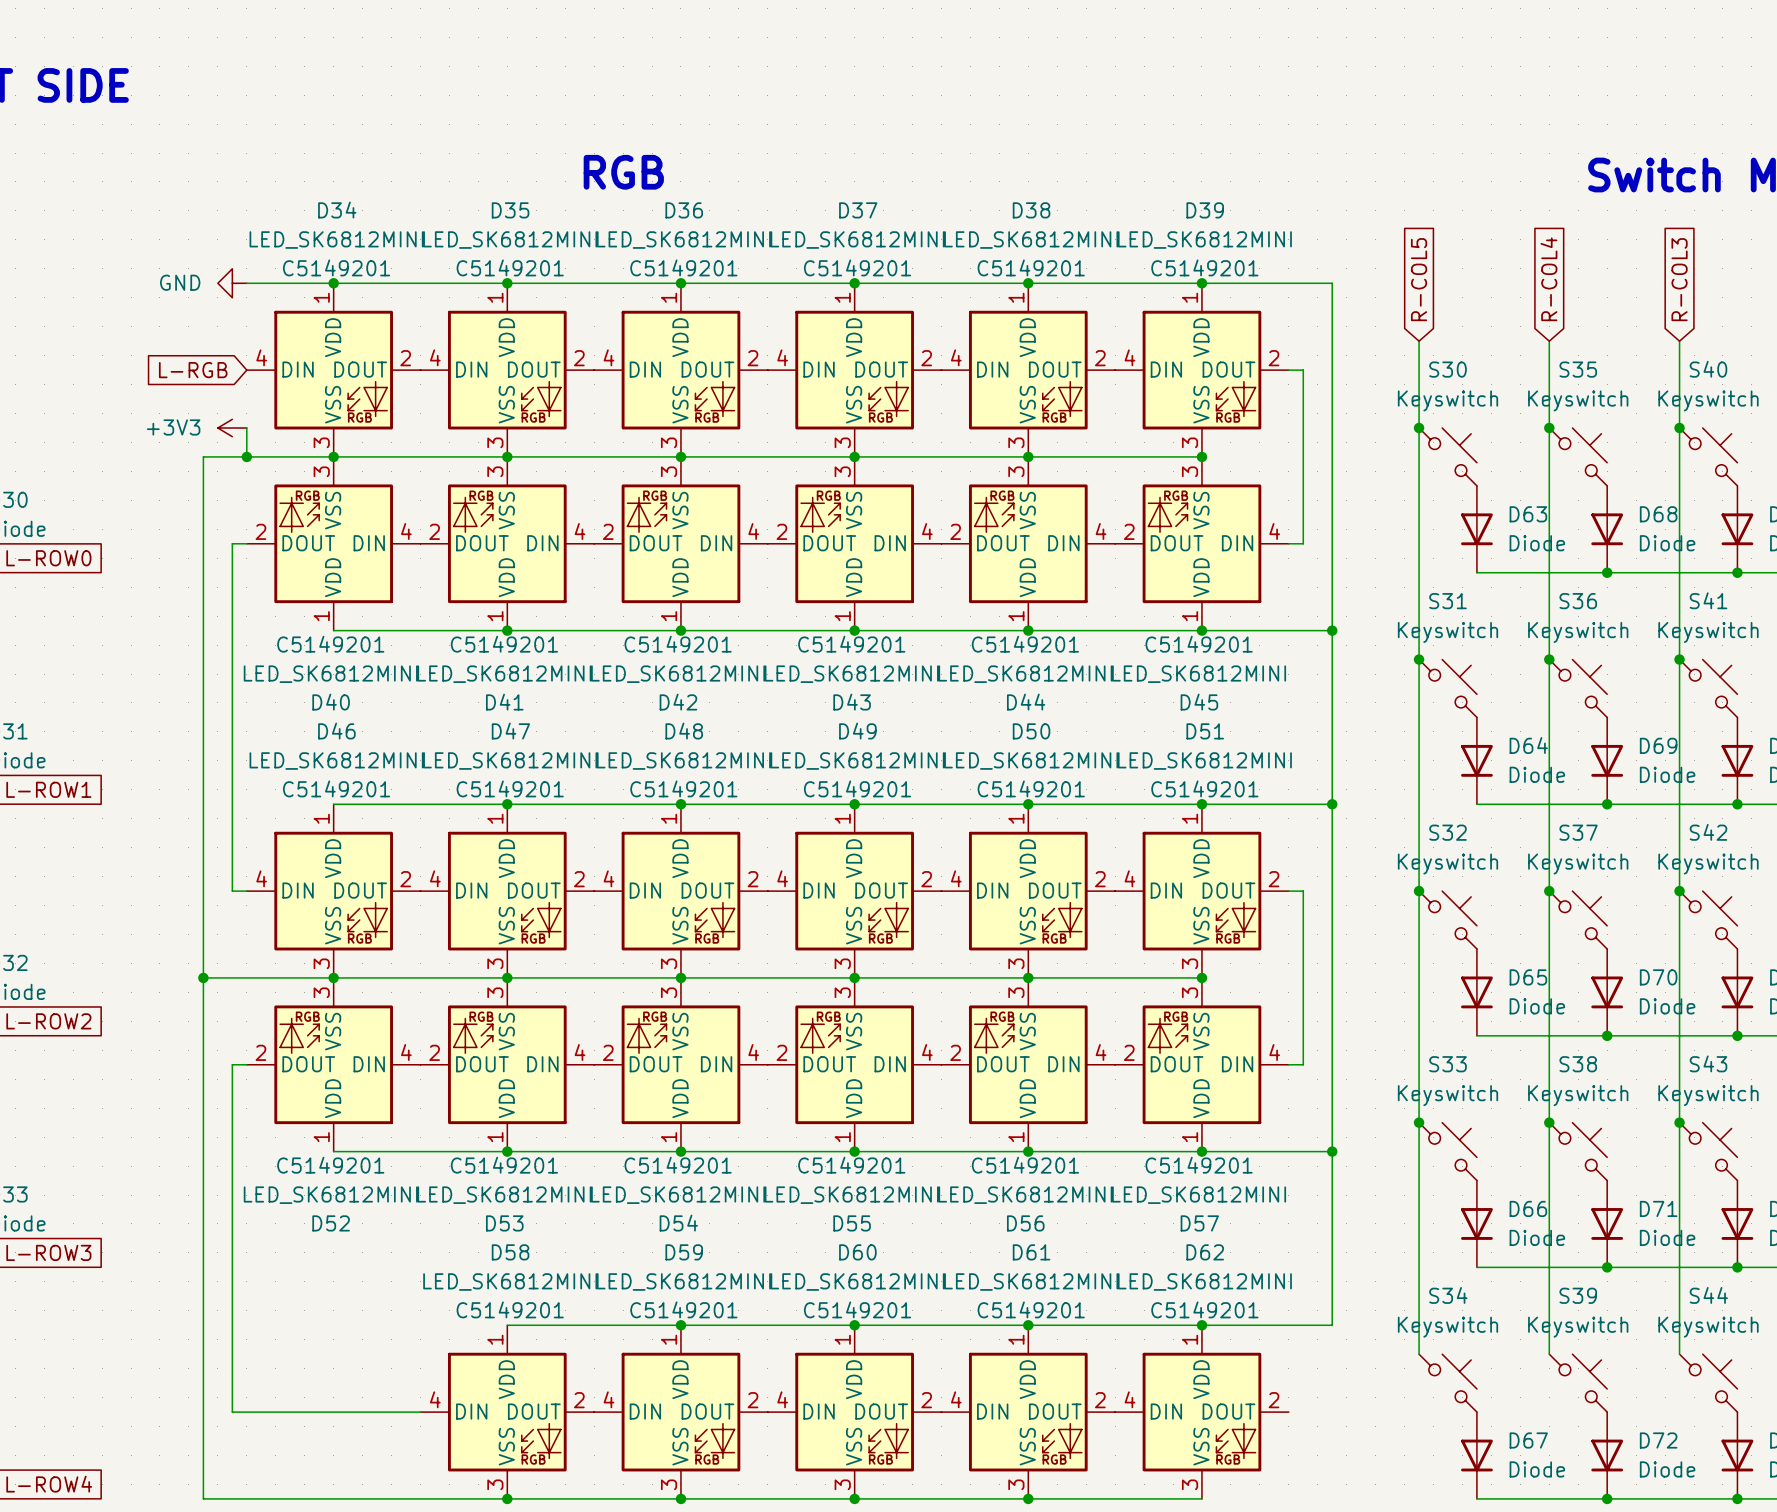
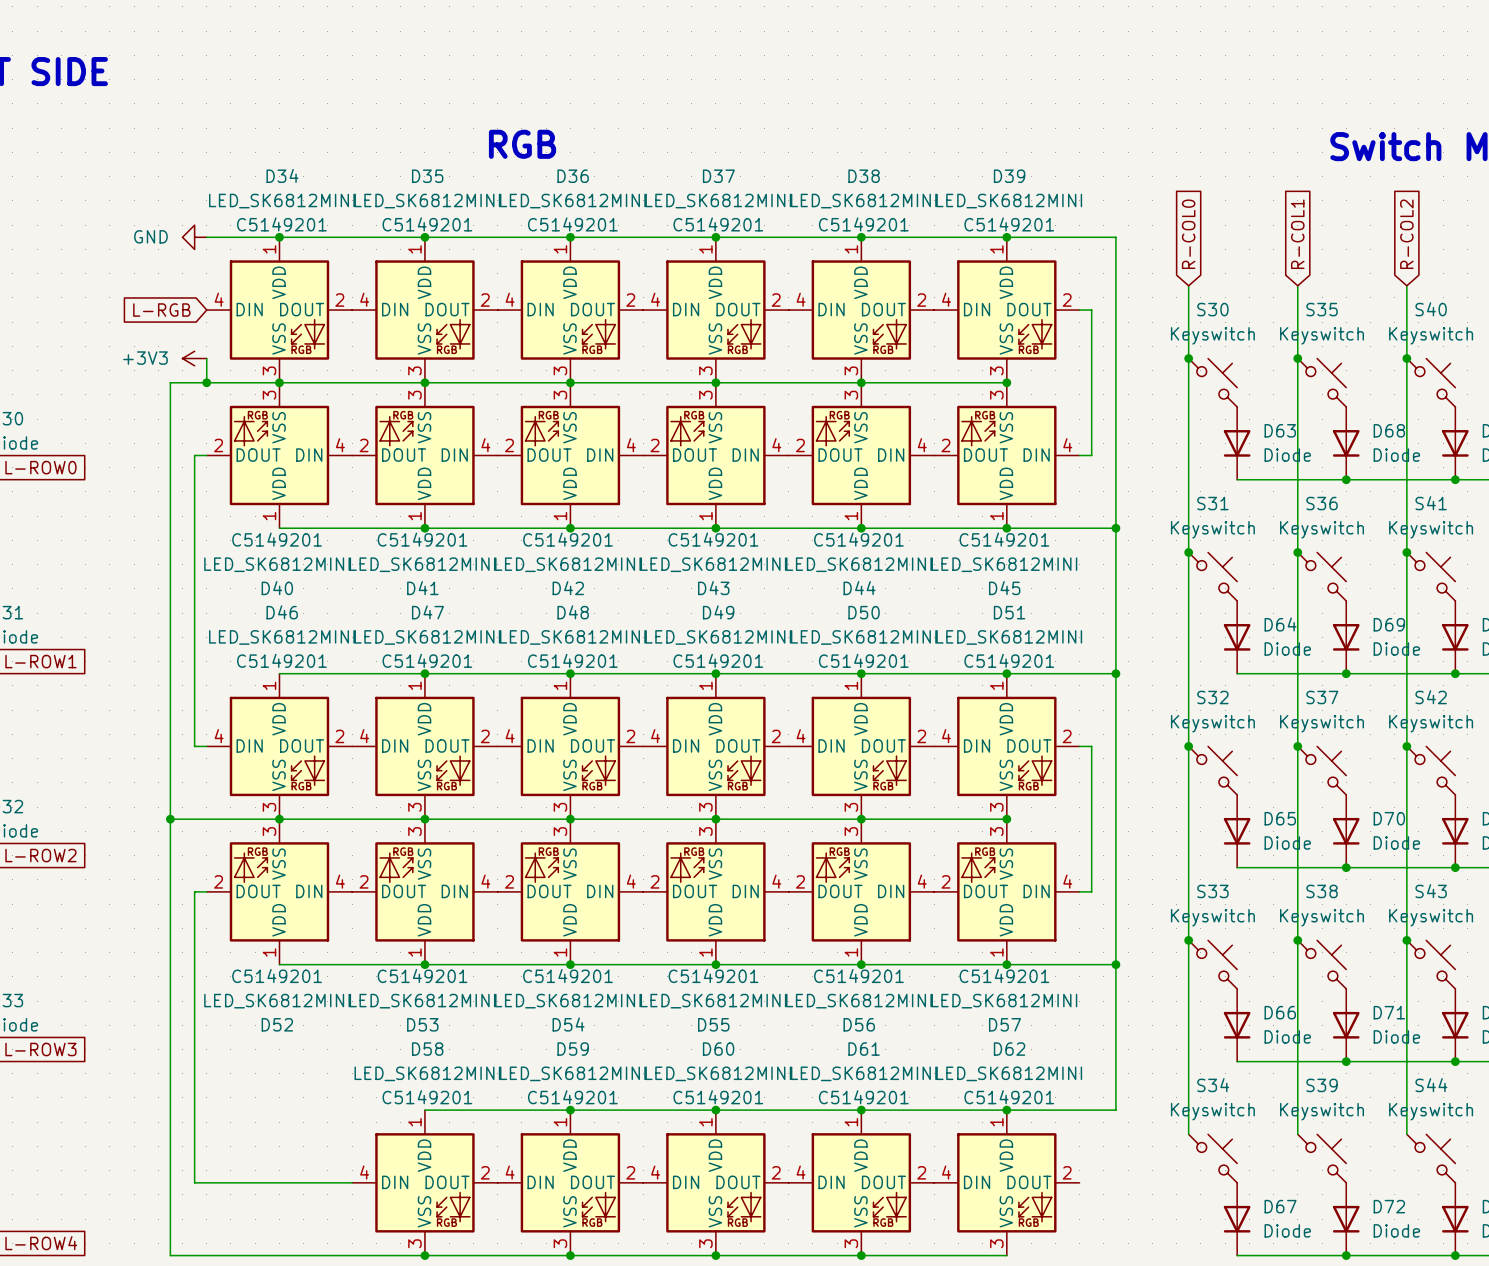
global label: R-COL5 (1419, 279) -> R-COL0 (1188, 234)
global label: R-COL4 (1548, 279) -> R-COL1 (1297, 234)
global label: R-COL3 (1679, 279) -> R-COL2 (1406, 234)

